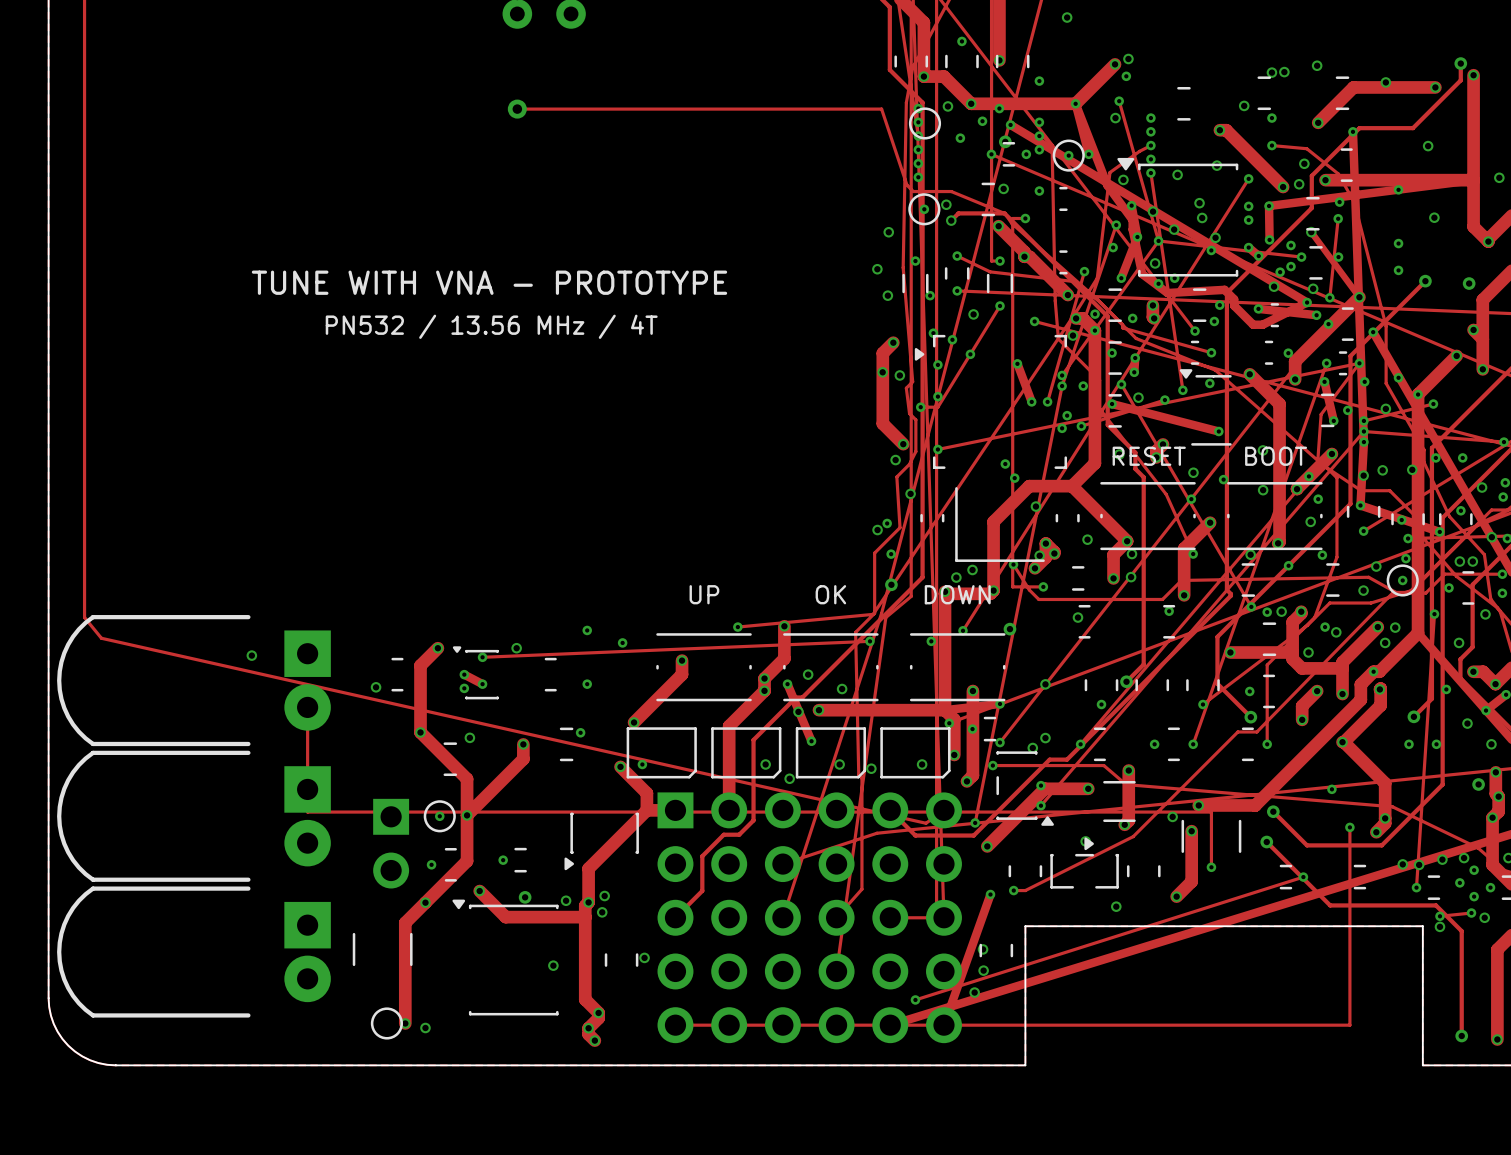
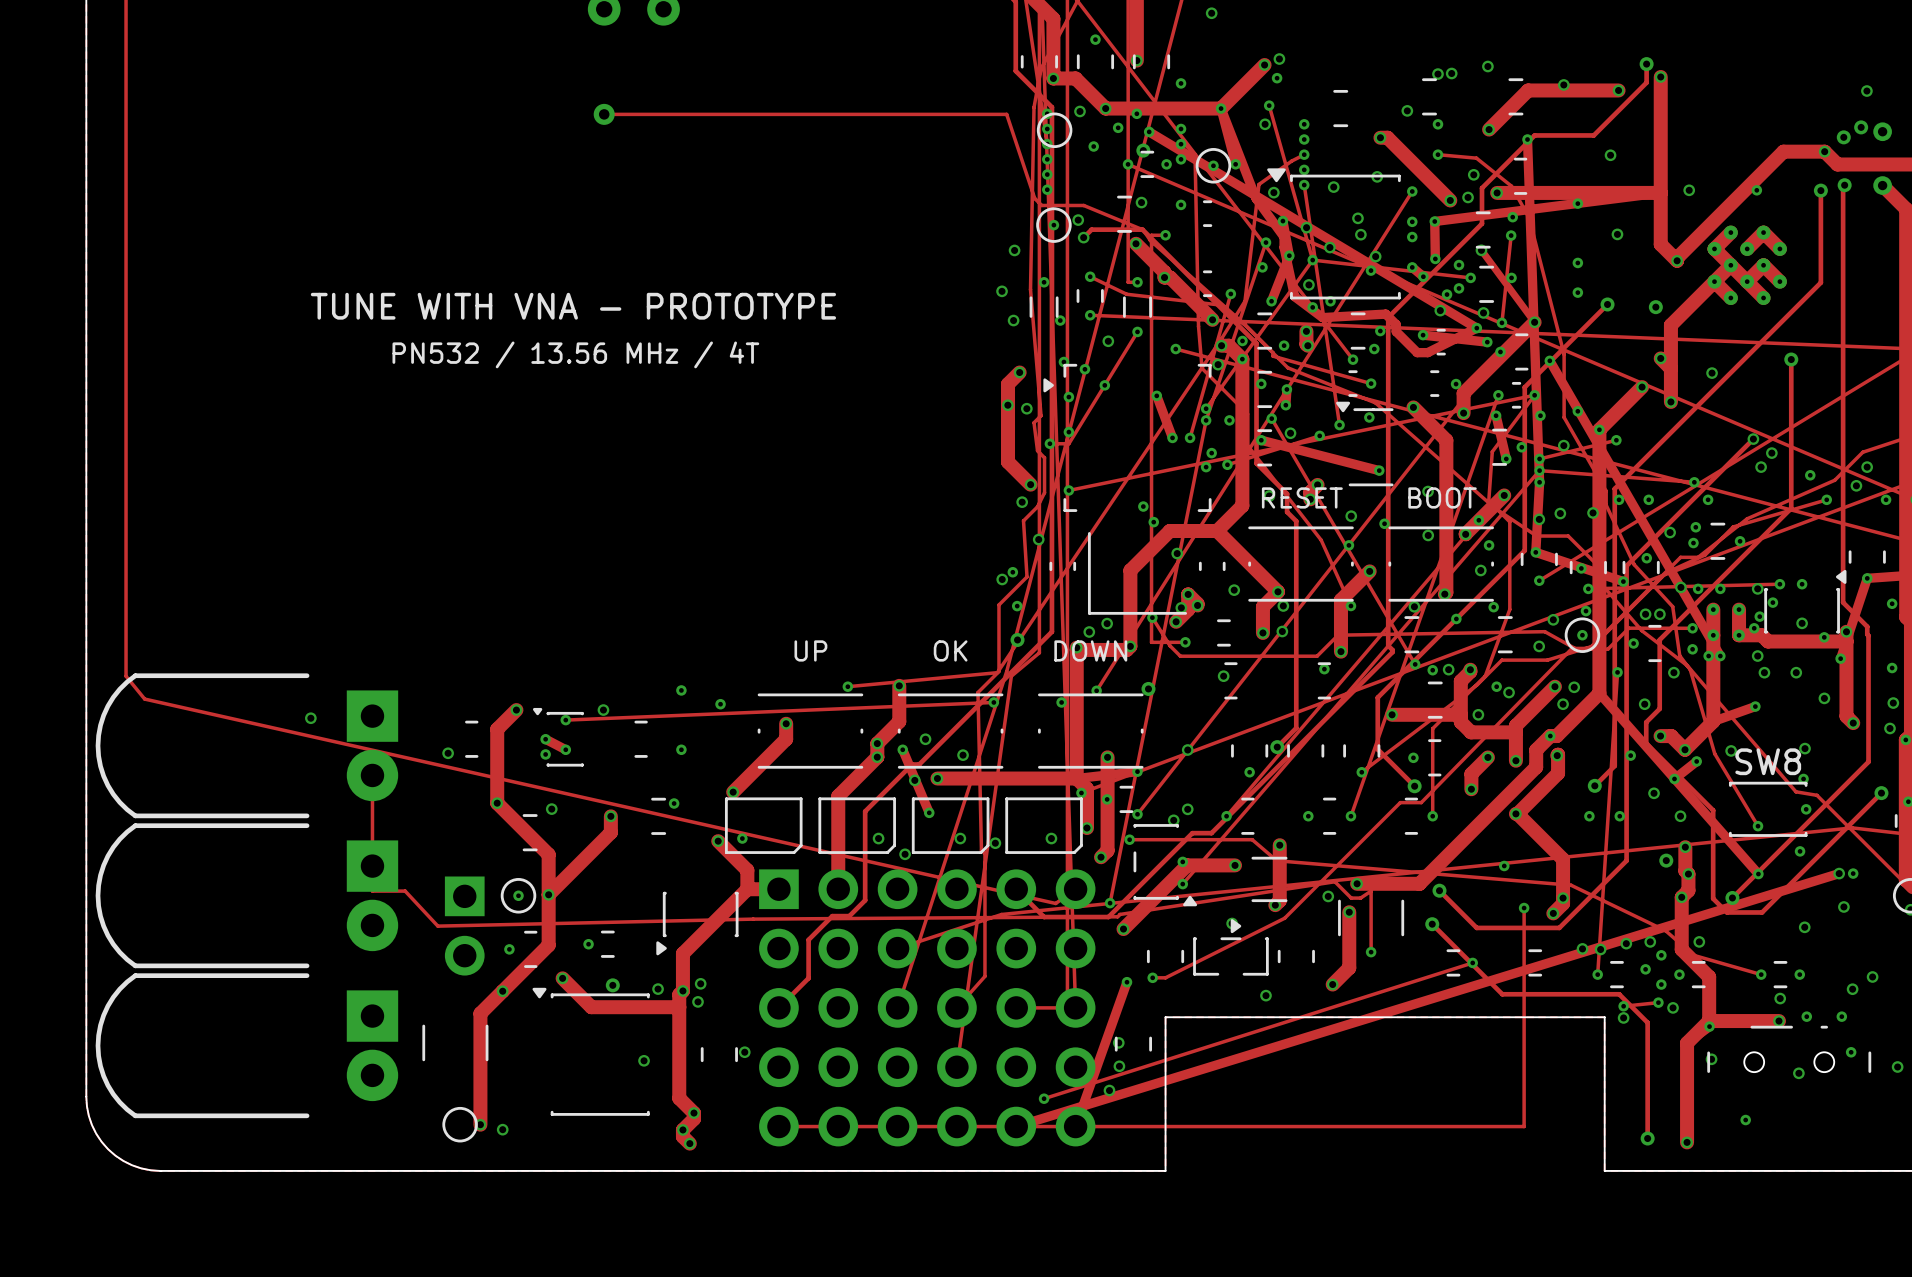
track: (337, 812) (1211, 812) -> (405, 891) (437, 926) (753, 919) (1117, 916) (1119, 914) (1334, 881) (1351, 898) (1360, 898) (1371, 891)

